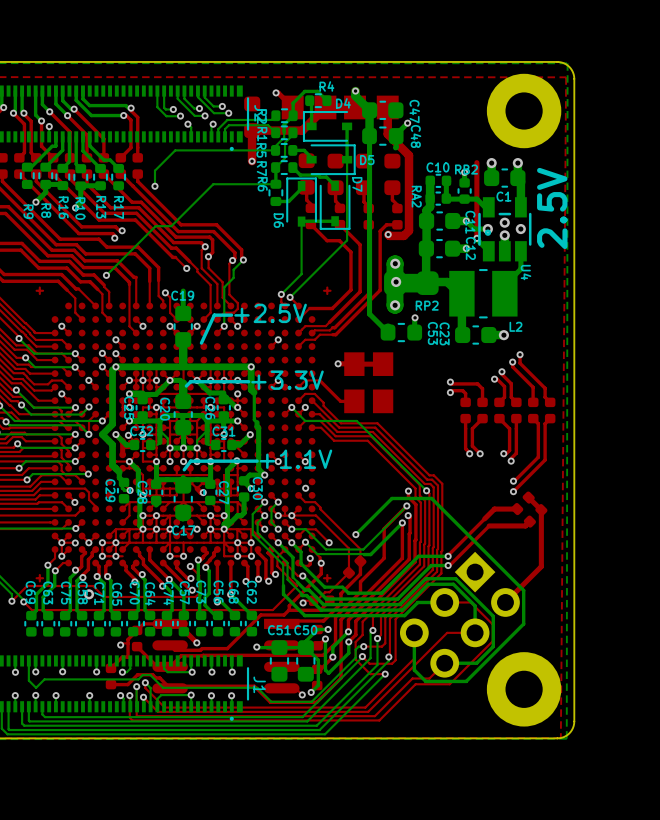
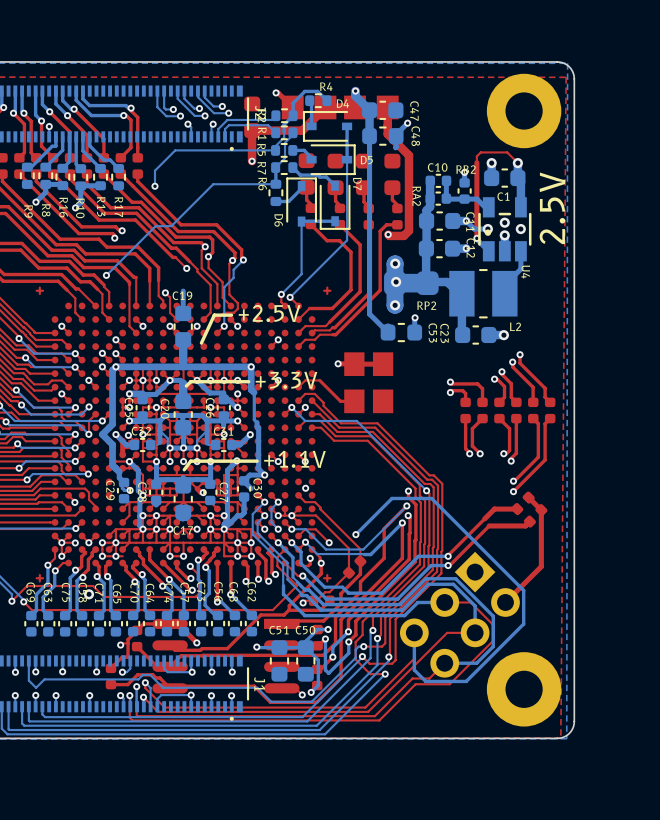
top track: none -> (476, 162) (476, 156) (480, 152) (507, 152) (517, 163)
via: (251, 488) -> none

